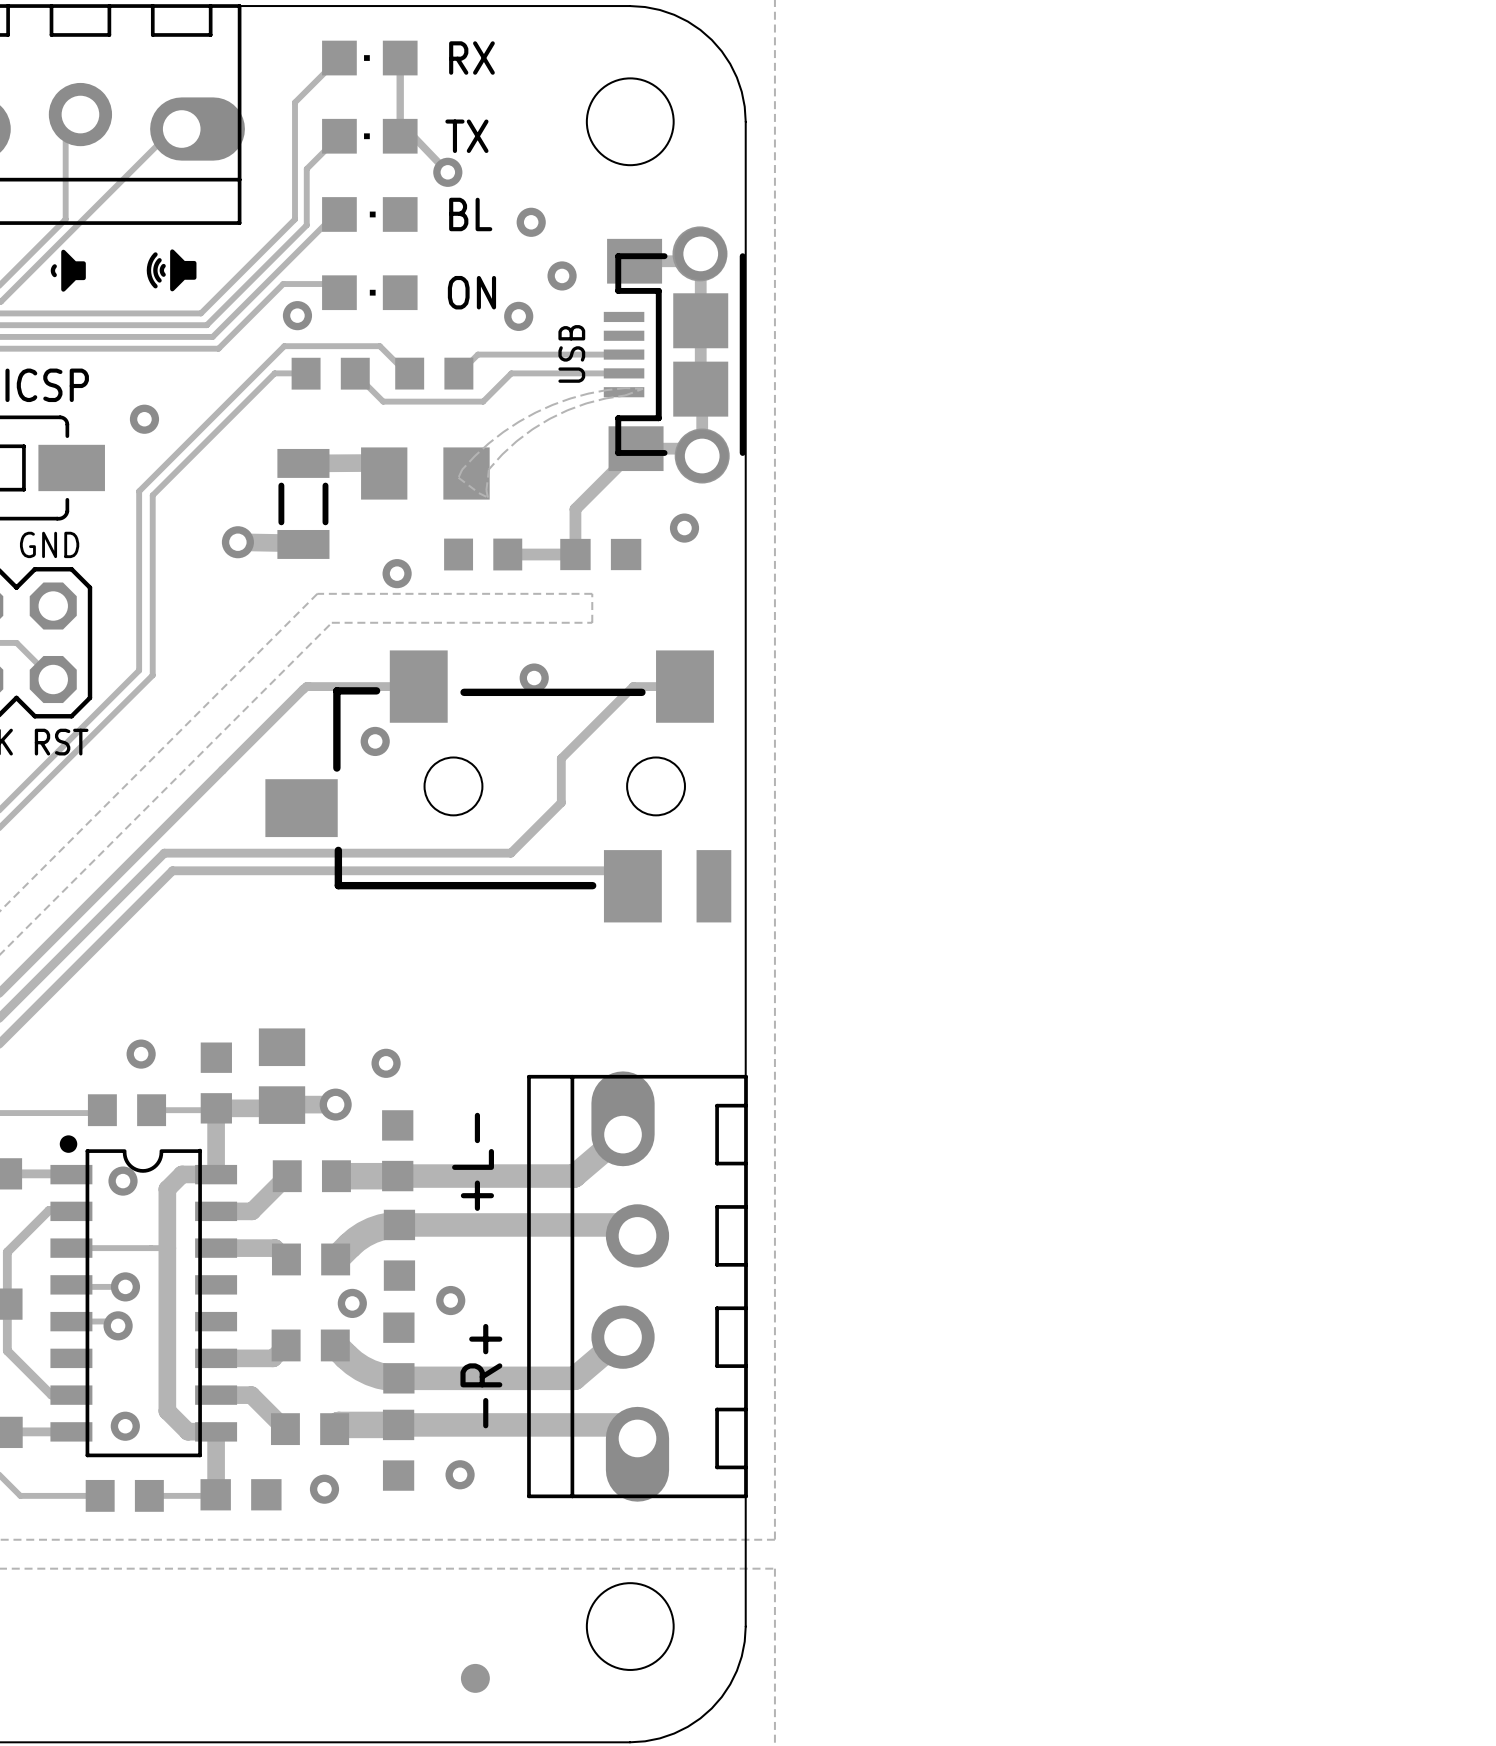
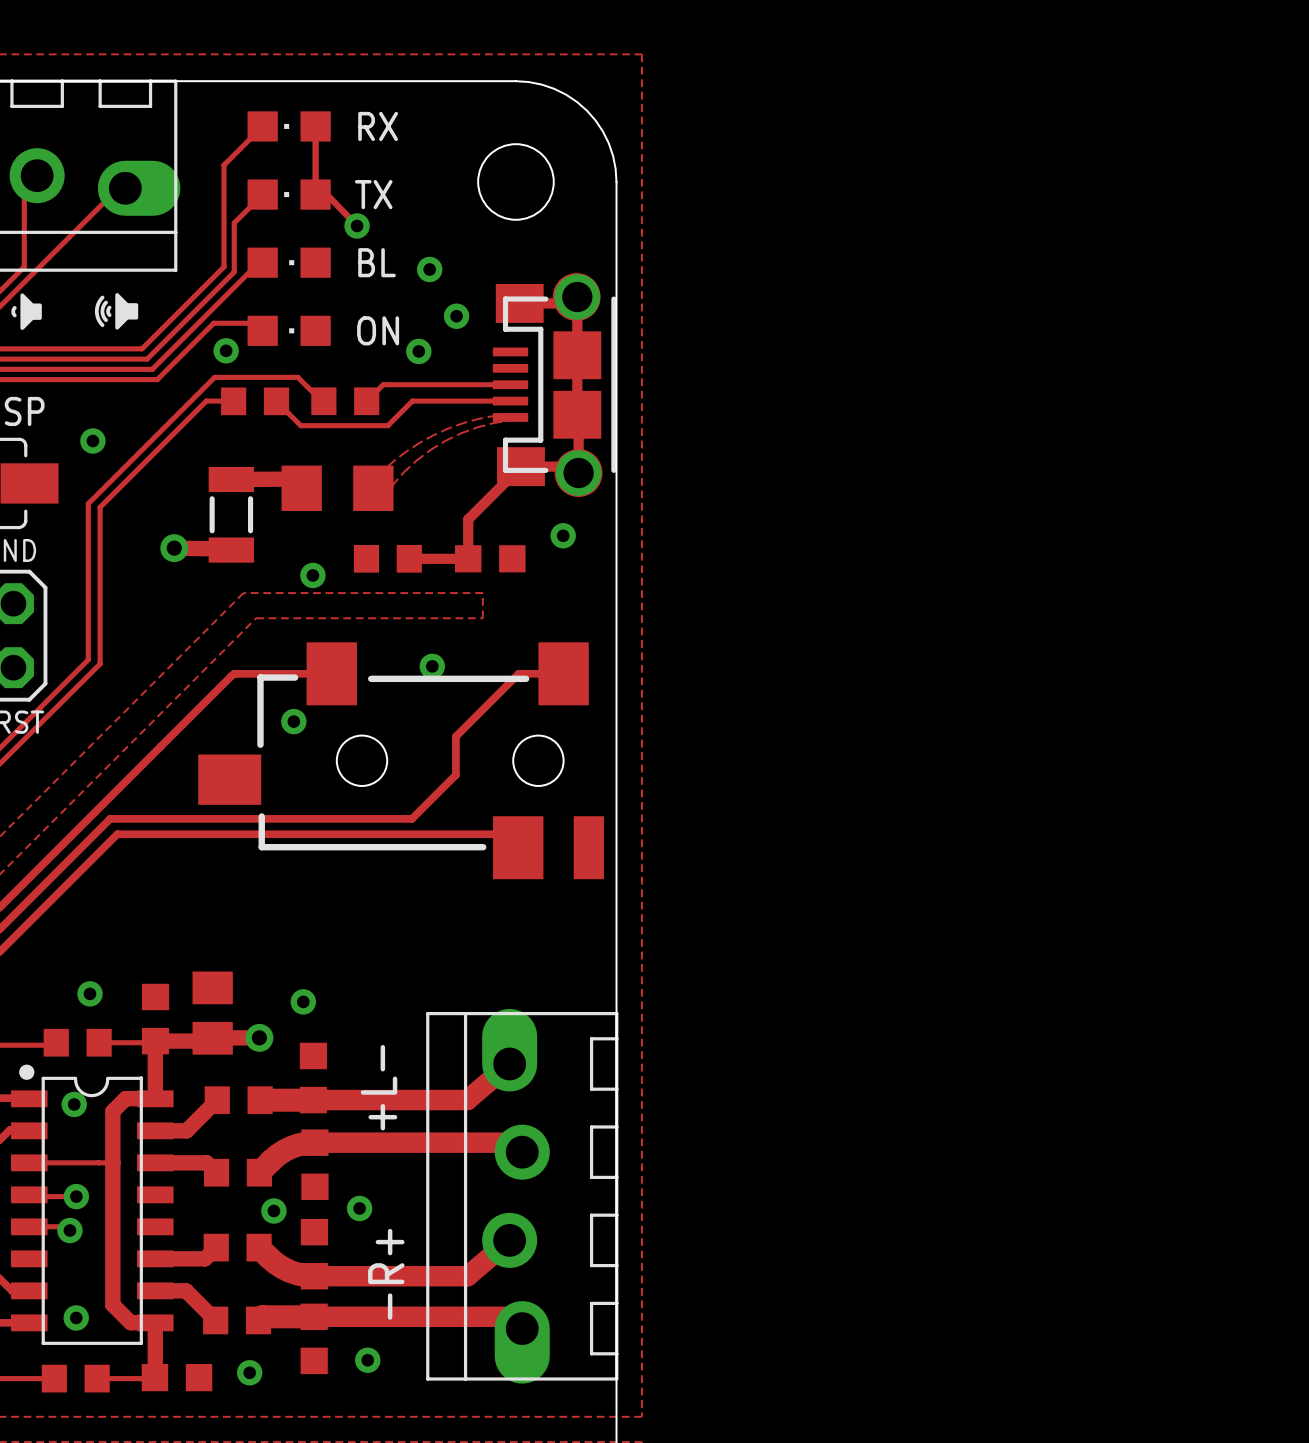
part text: USB (571, 353) -> none

